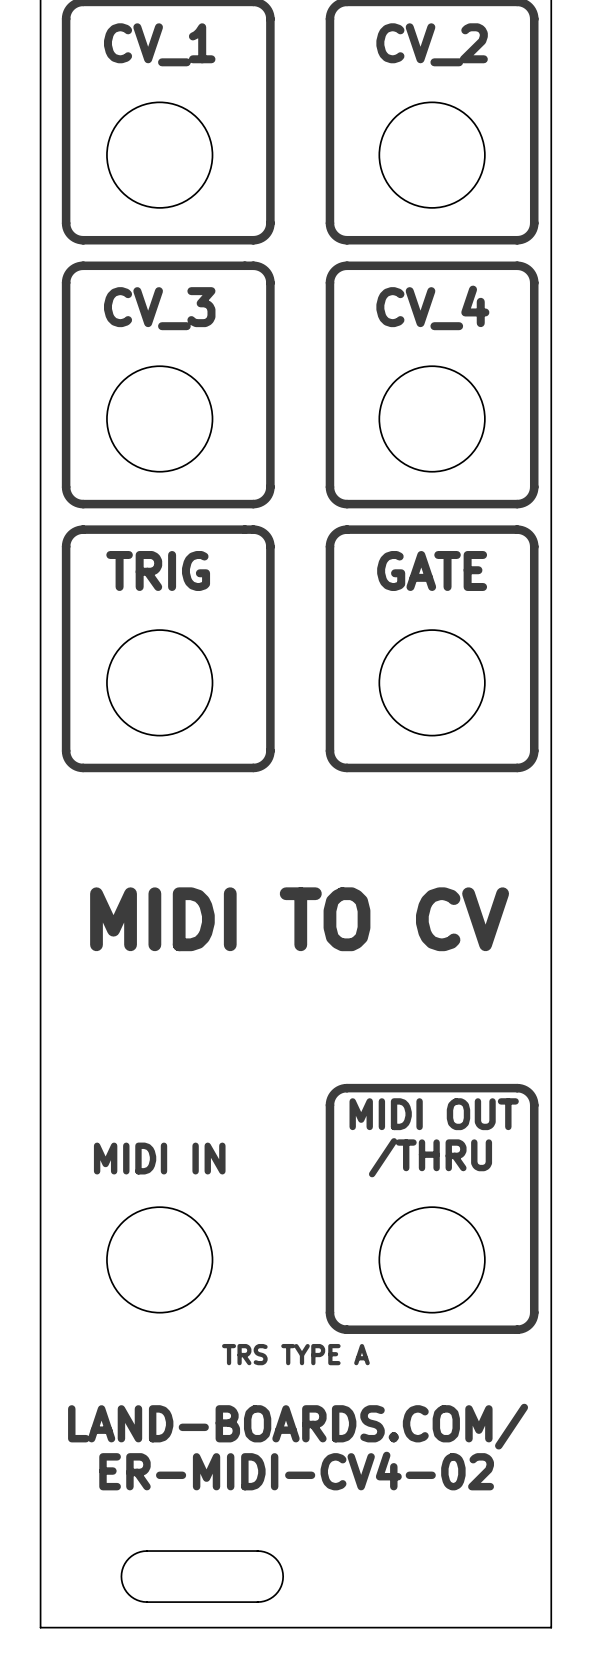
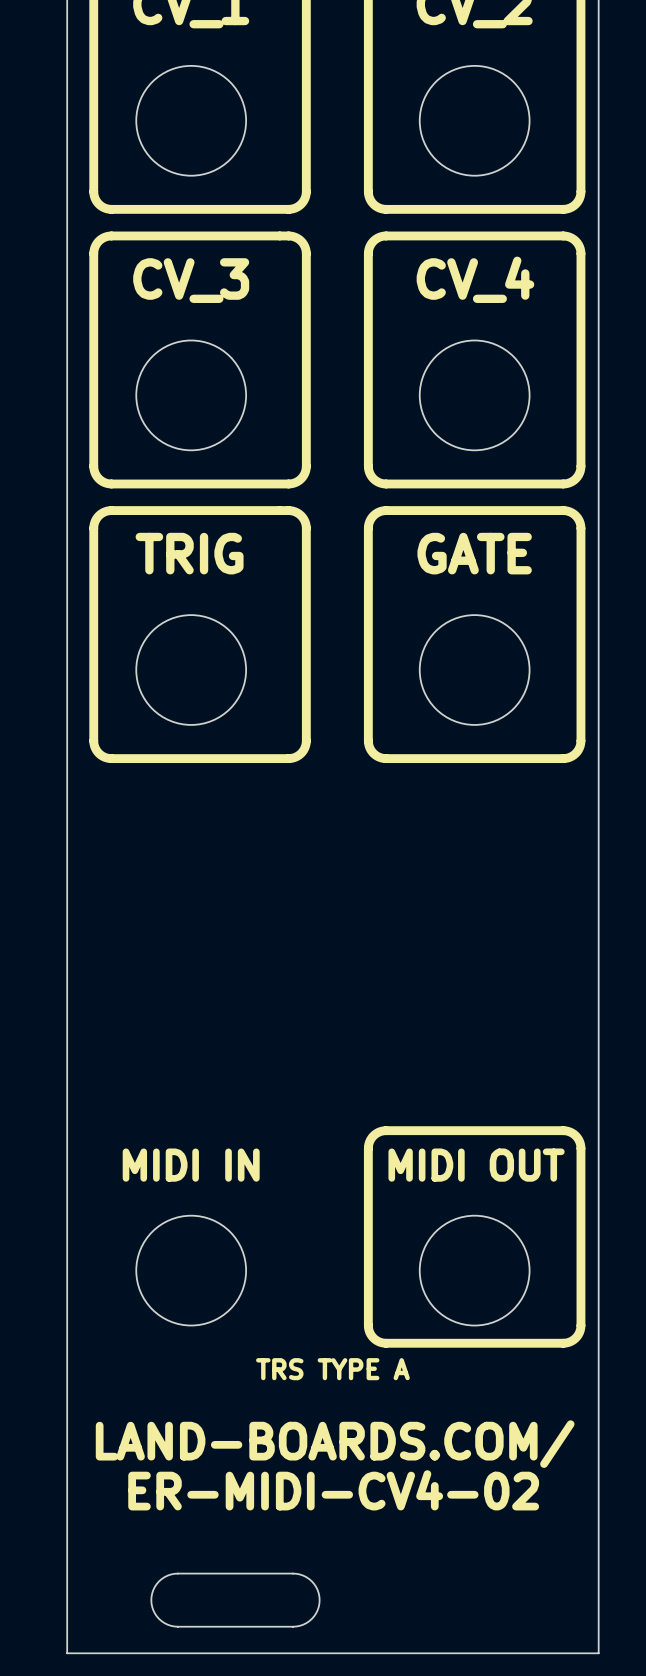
text: MIDI TO CV (299, 919) -> none
text position: MIDI OUT (434, 1114) -> MIDI OUT (476, 1165)
line: (329, 1142) (330, 1100) (336, 1091) (346, 1088) (521, 1088) (529, 1093) (533, 1100) (534, 1142) -> (368, 1148) (373, 1135) (386, 1130) (565, 1130) (577, 1137) (580, 1148)
text: /THRU (430, 1157) -> none

